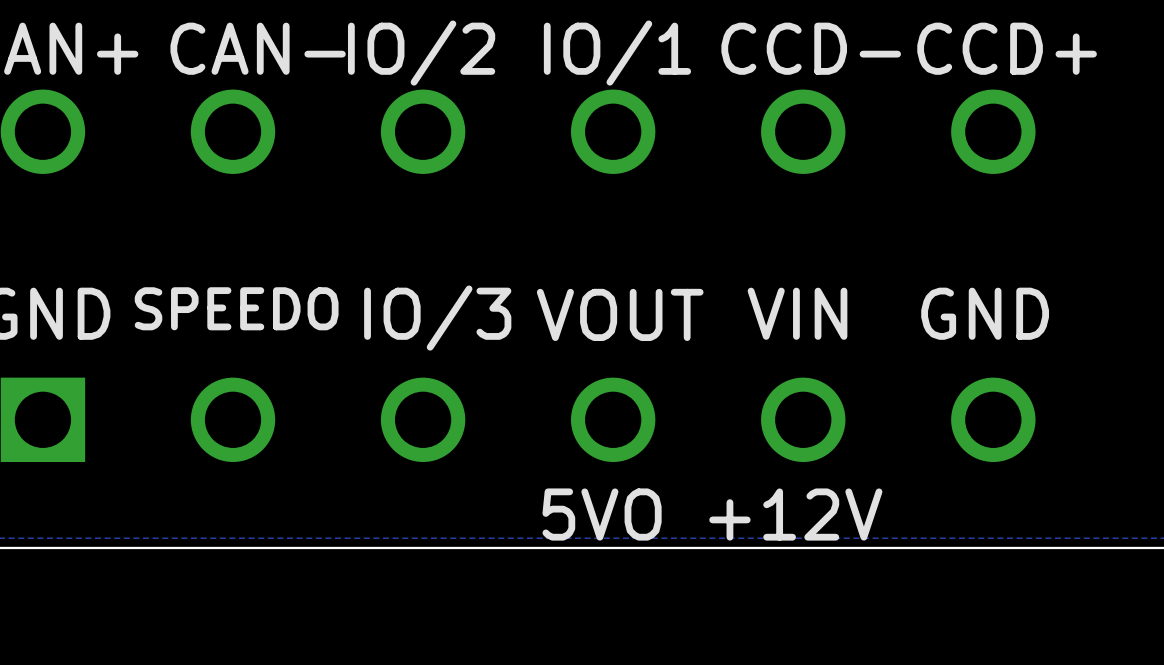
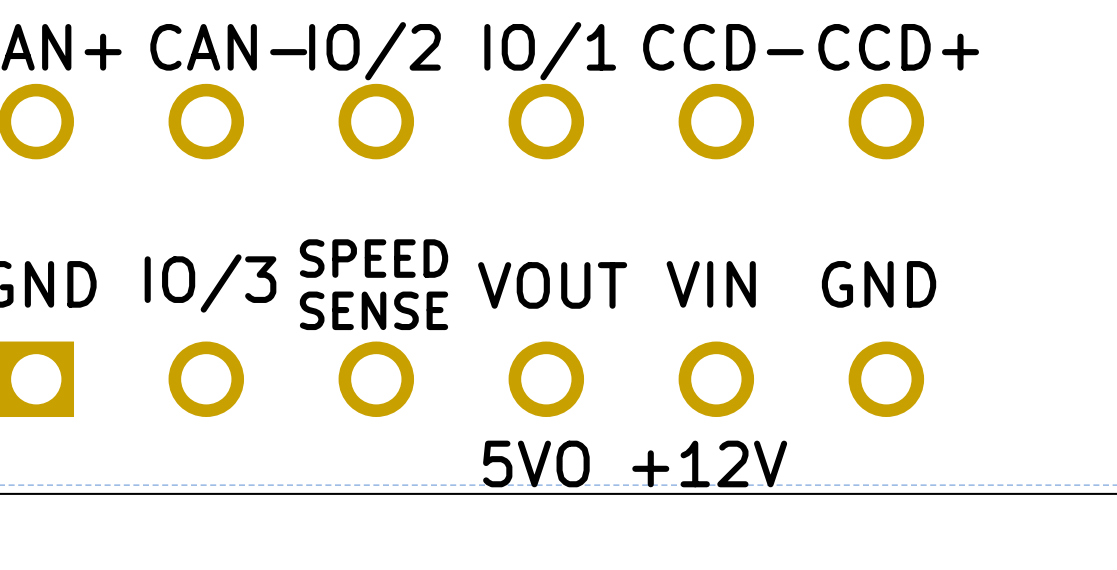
text: none -> SPEED (374, 258)
text: SPEEDO (236, 308) -> IO/3 (210, 283)
text: IO/3 (437, 318) -> none
text: none -> SENSE (374, 310)

